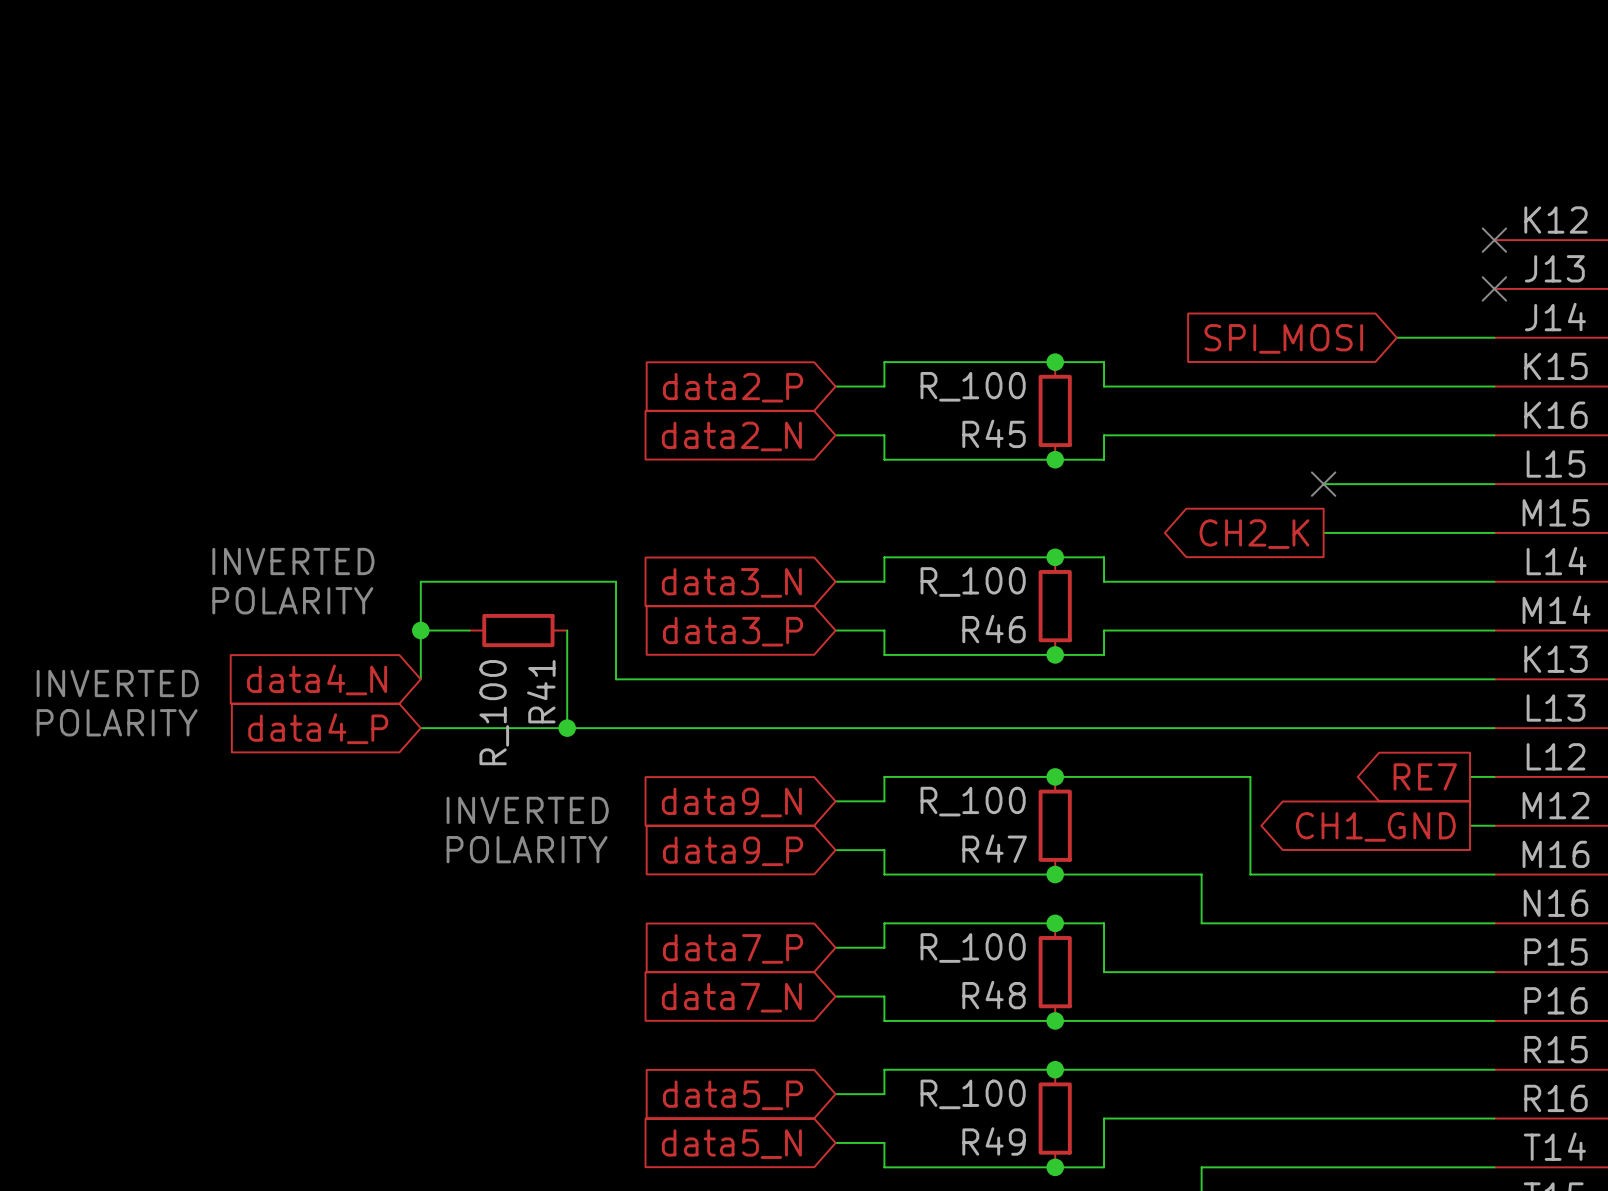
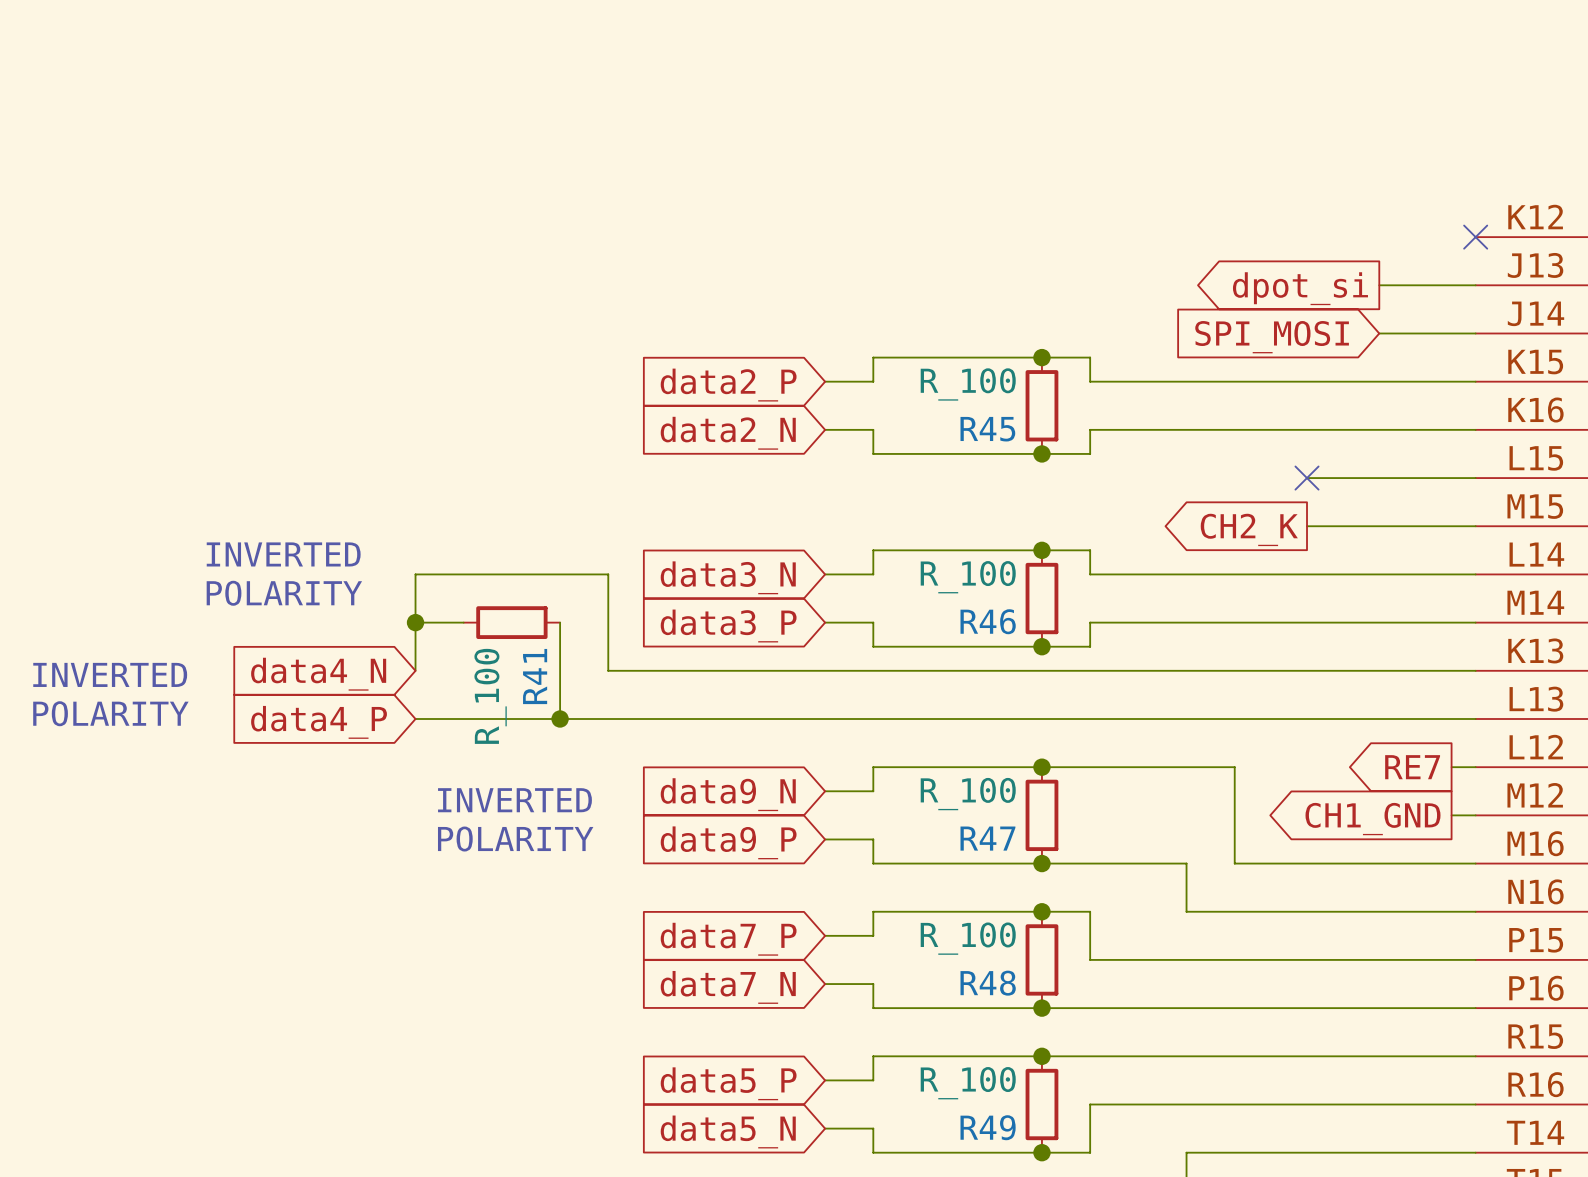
wire: none -> (1379, 285) (1475, 285)
no-connect mark: (1494, 288) -> none
global label: none -> dpot_si (1300, 288)

